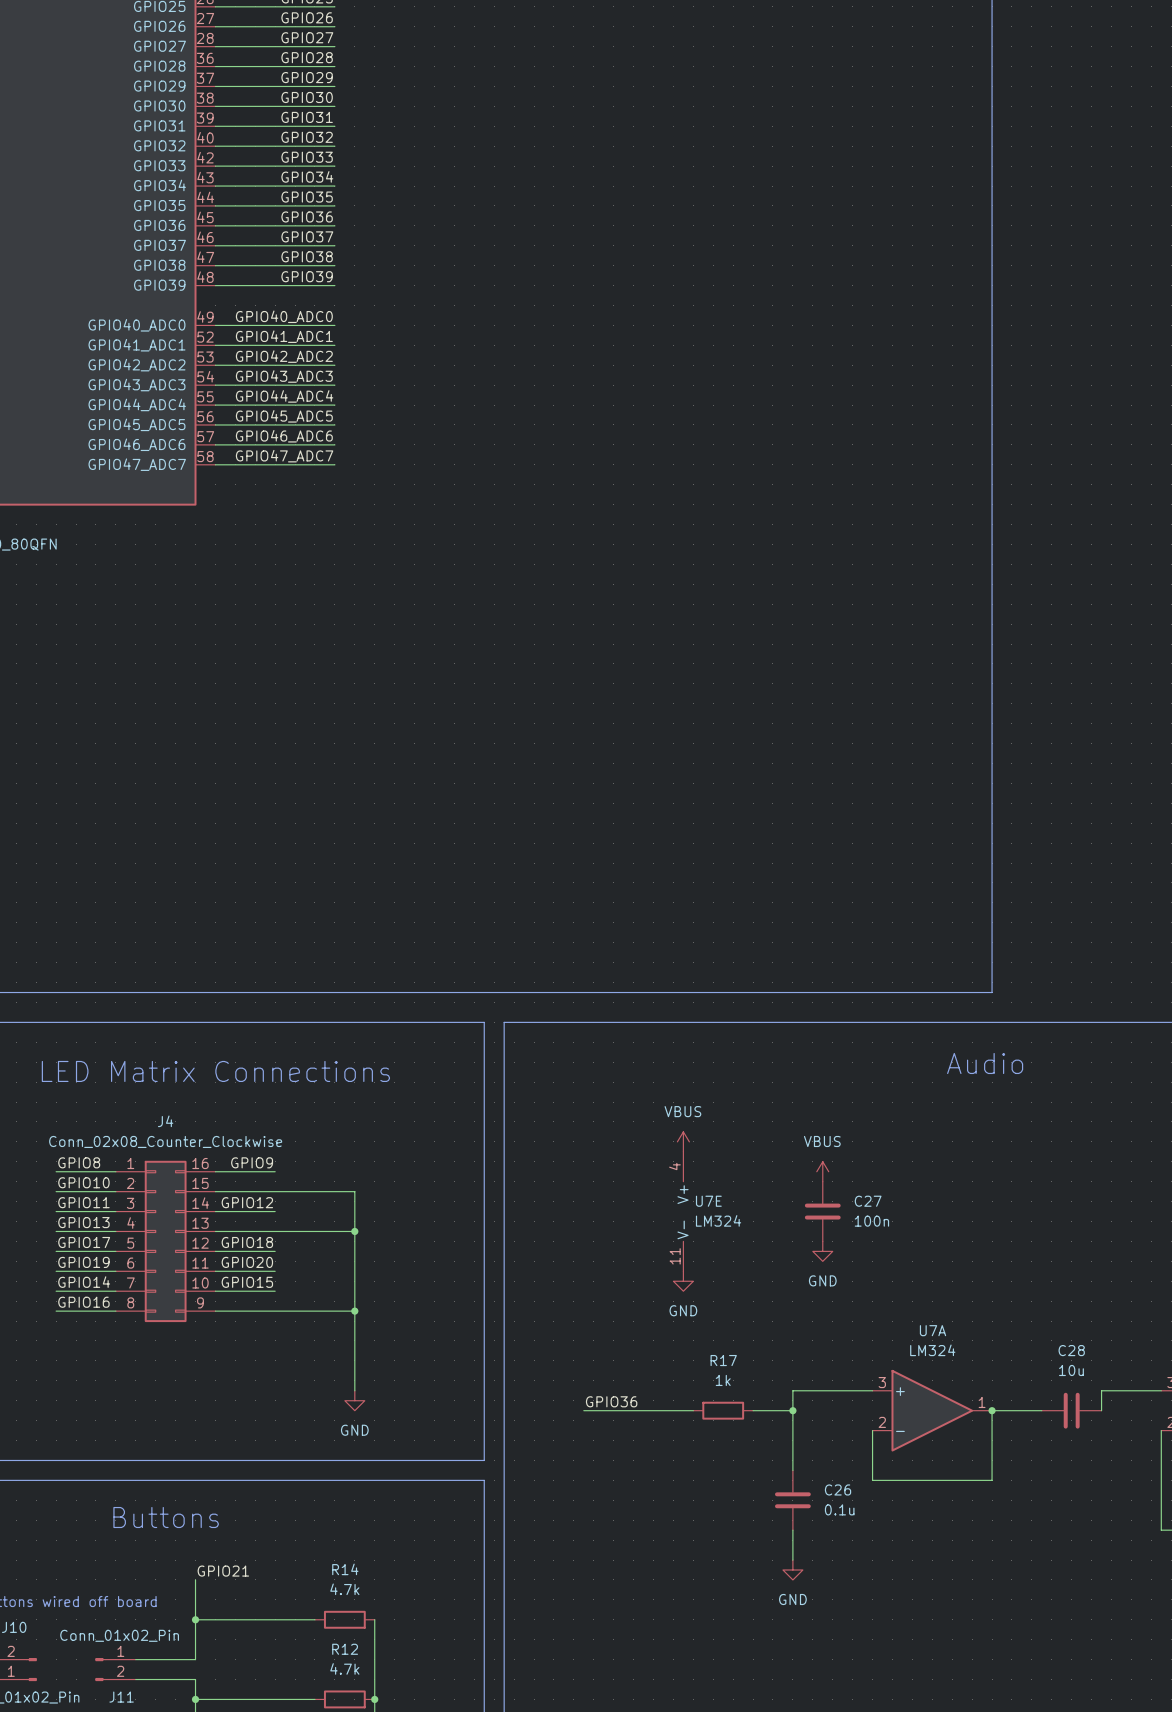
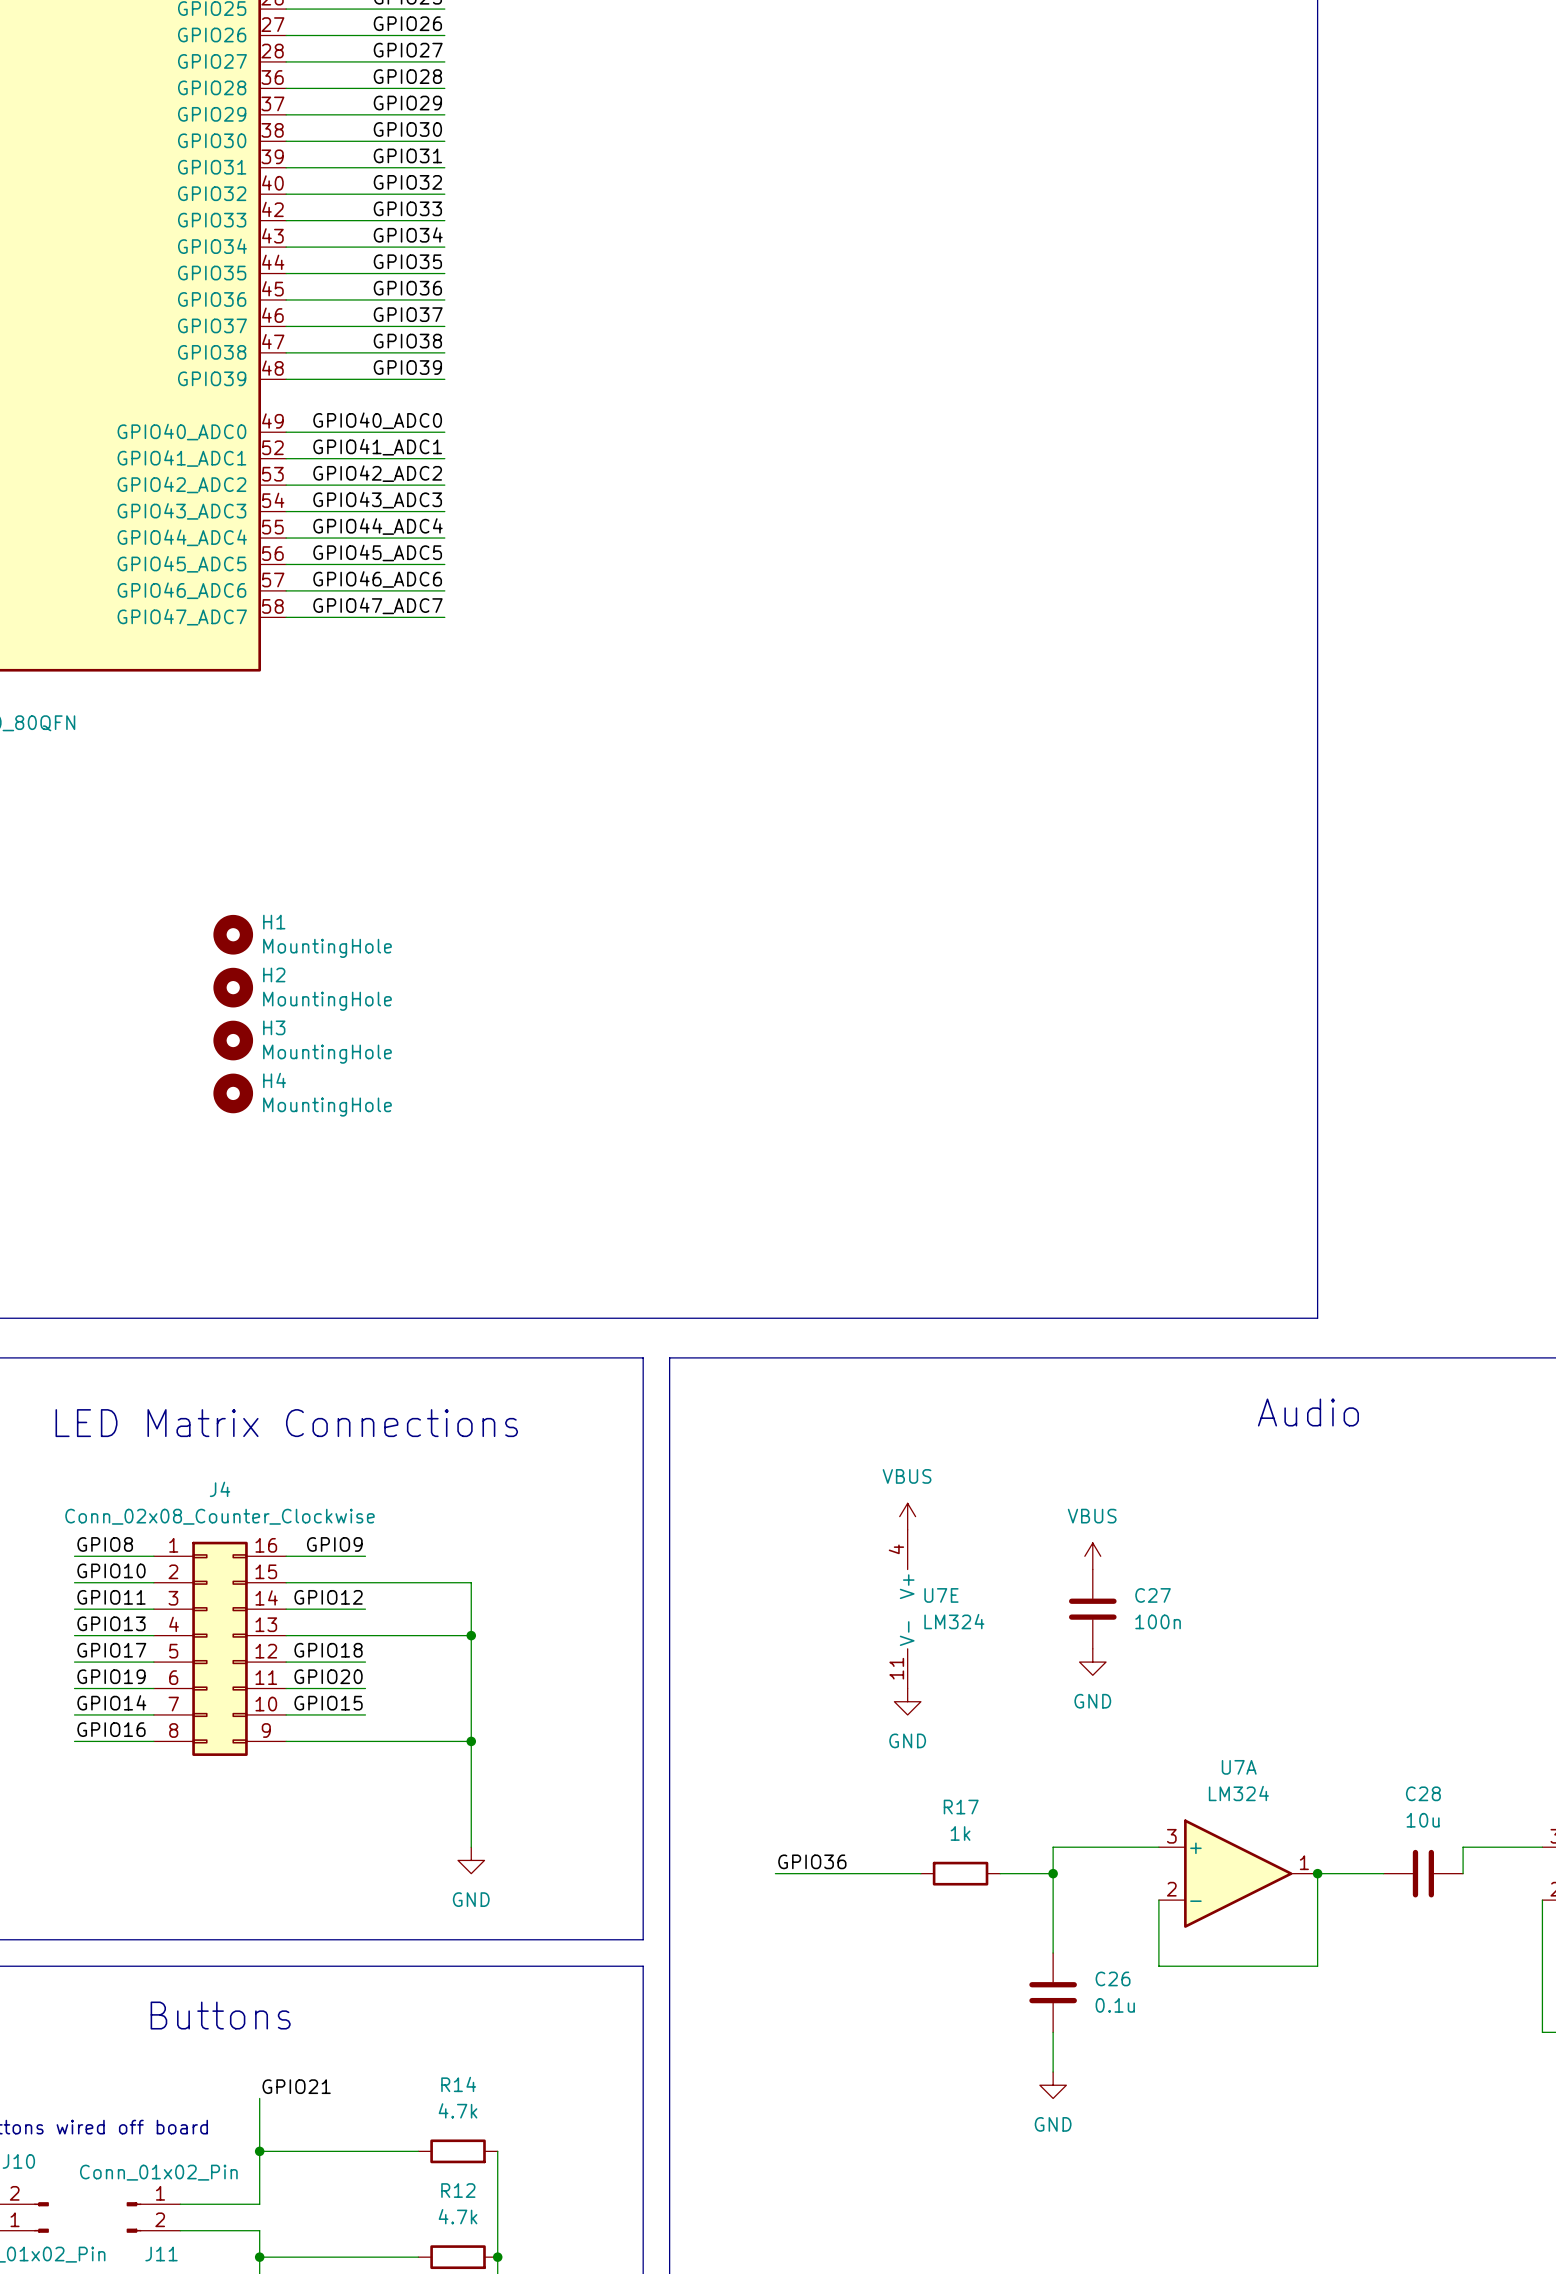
H1: none -> MountingHole (233, 934)
H2: none -> MountingHole (233, 987)
H3: none -> MountingHole (233, 1040)
H4: none -> MountingHole (233, 1093)

